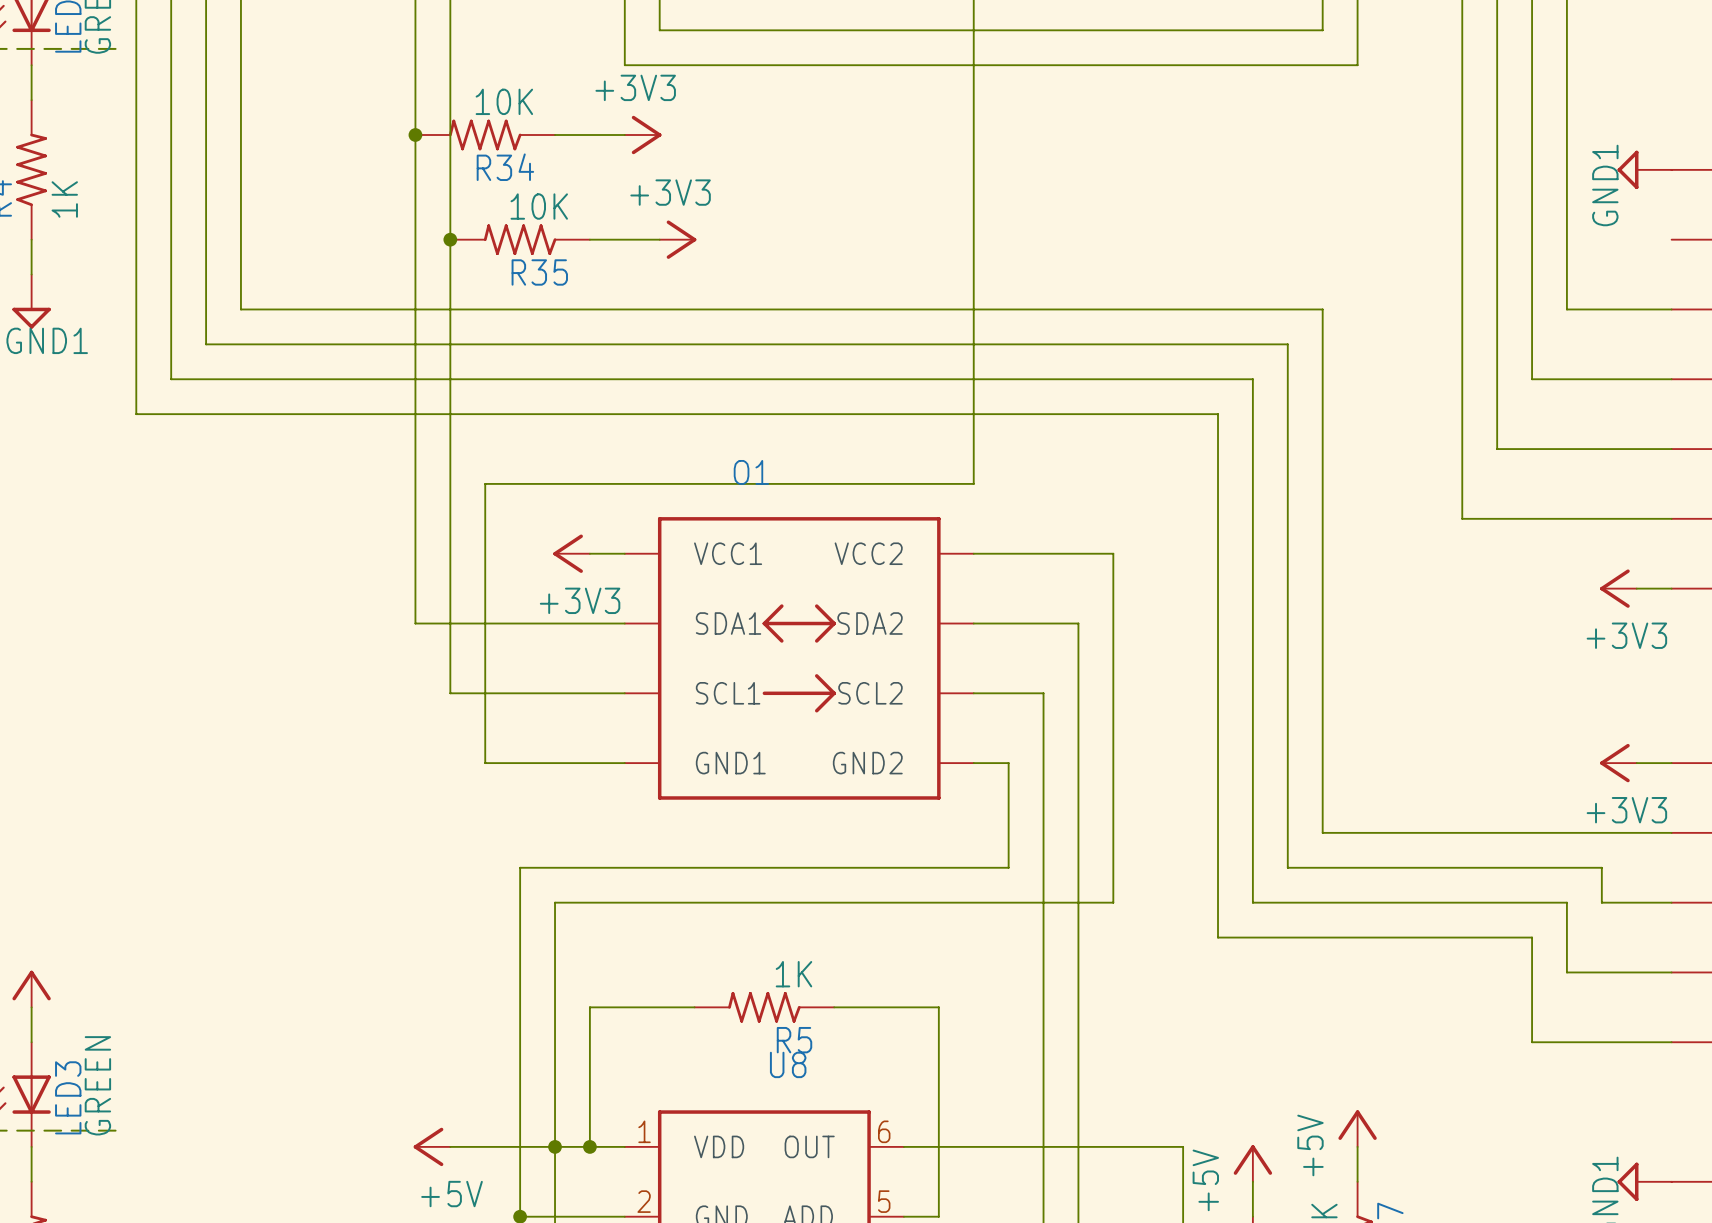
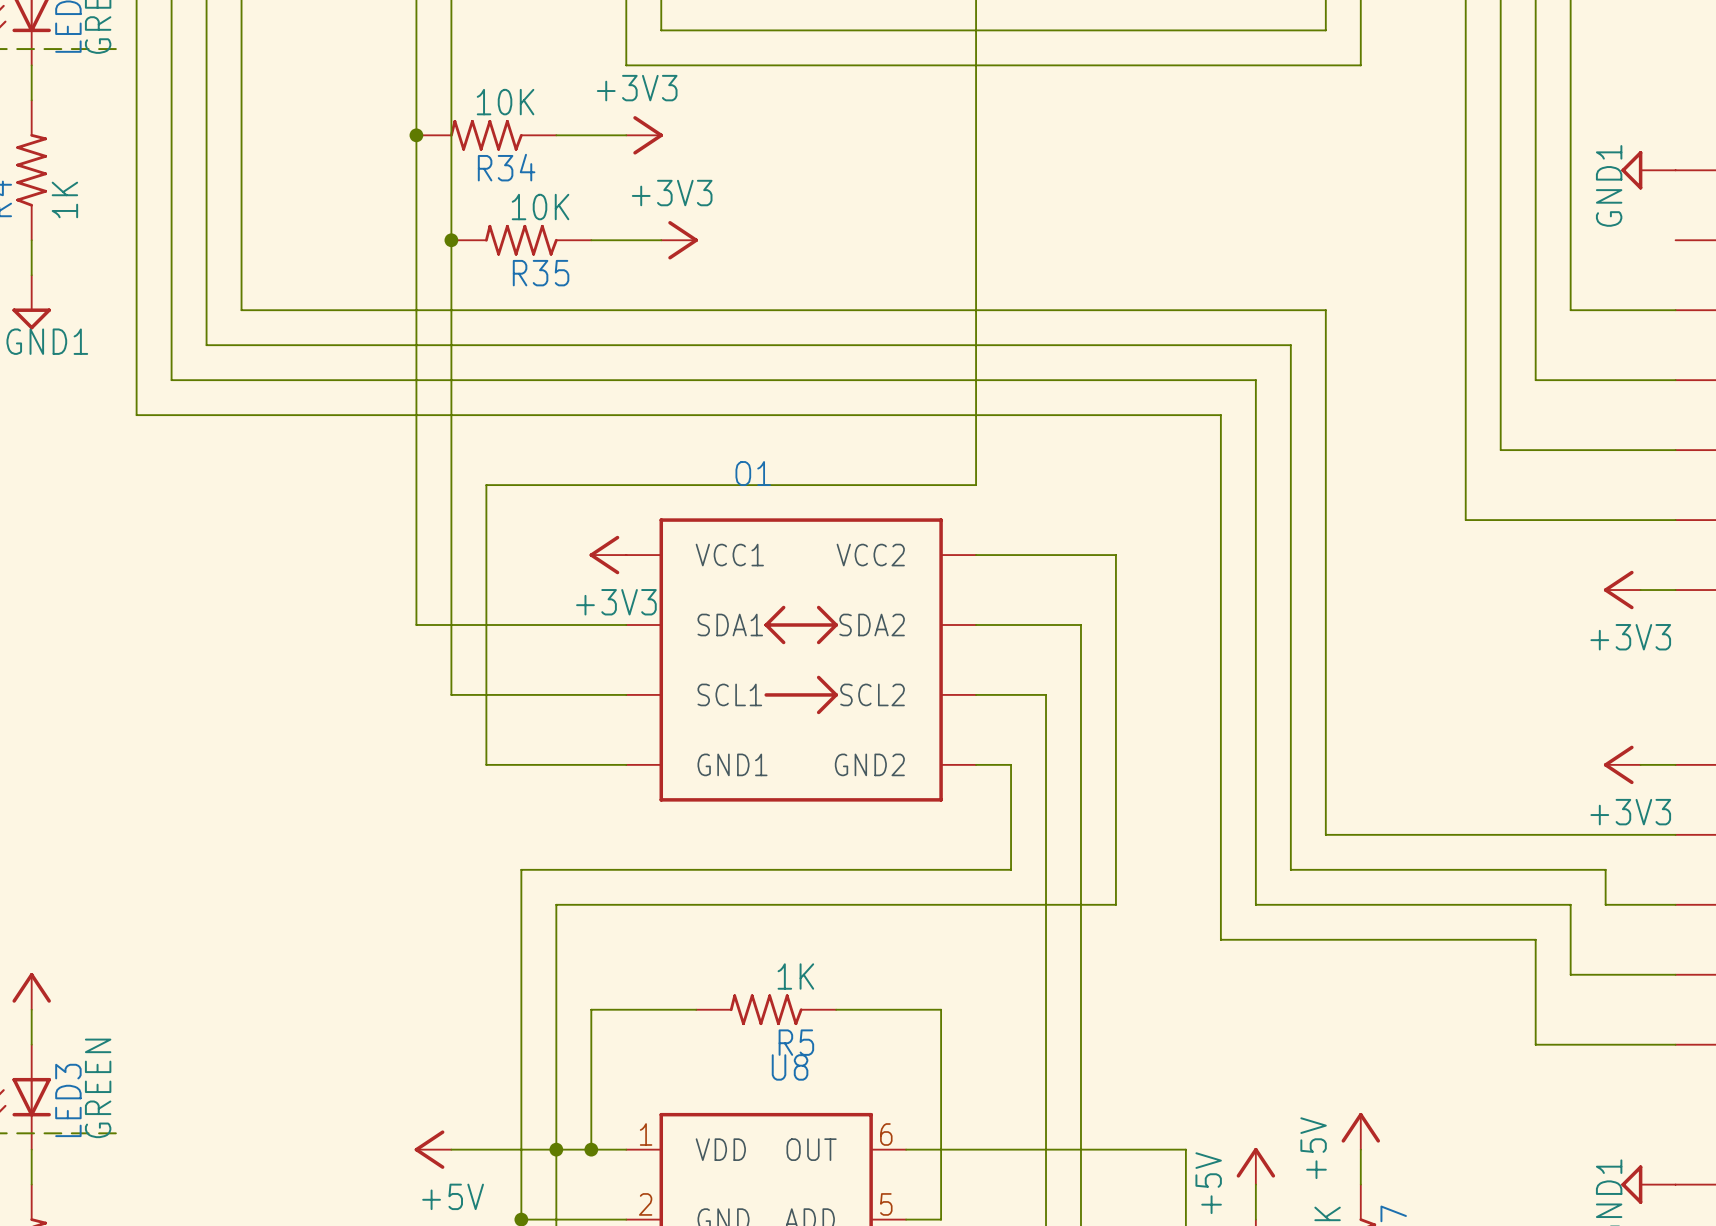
power symbol position: +3V3 (571, 553) -> +3V3 (607, 555)

